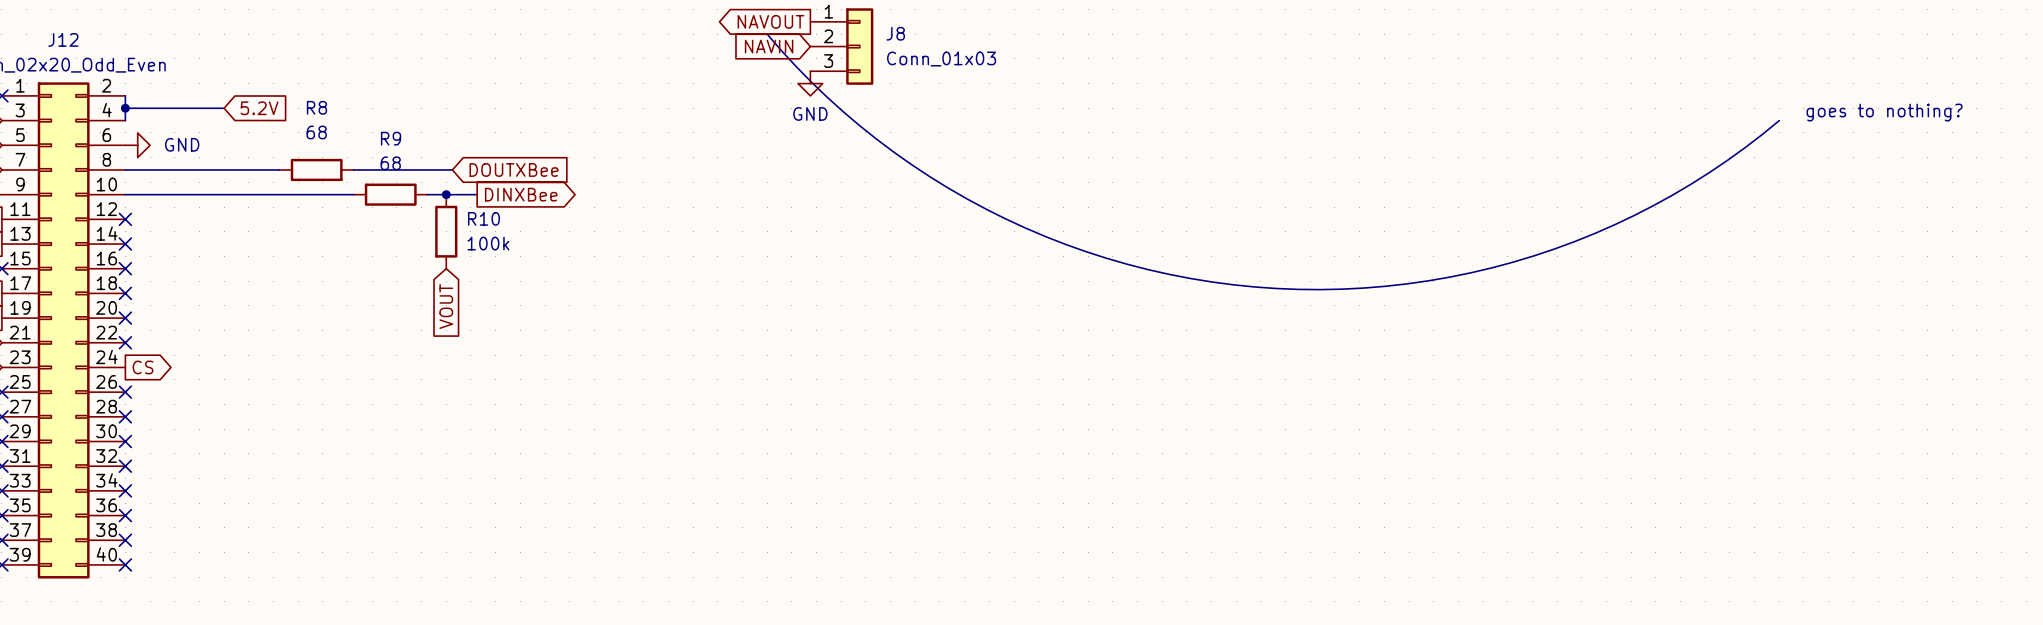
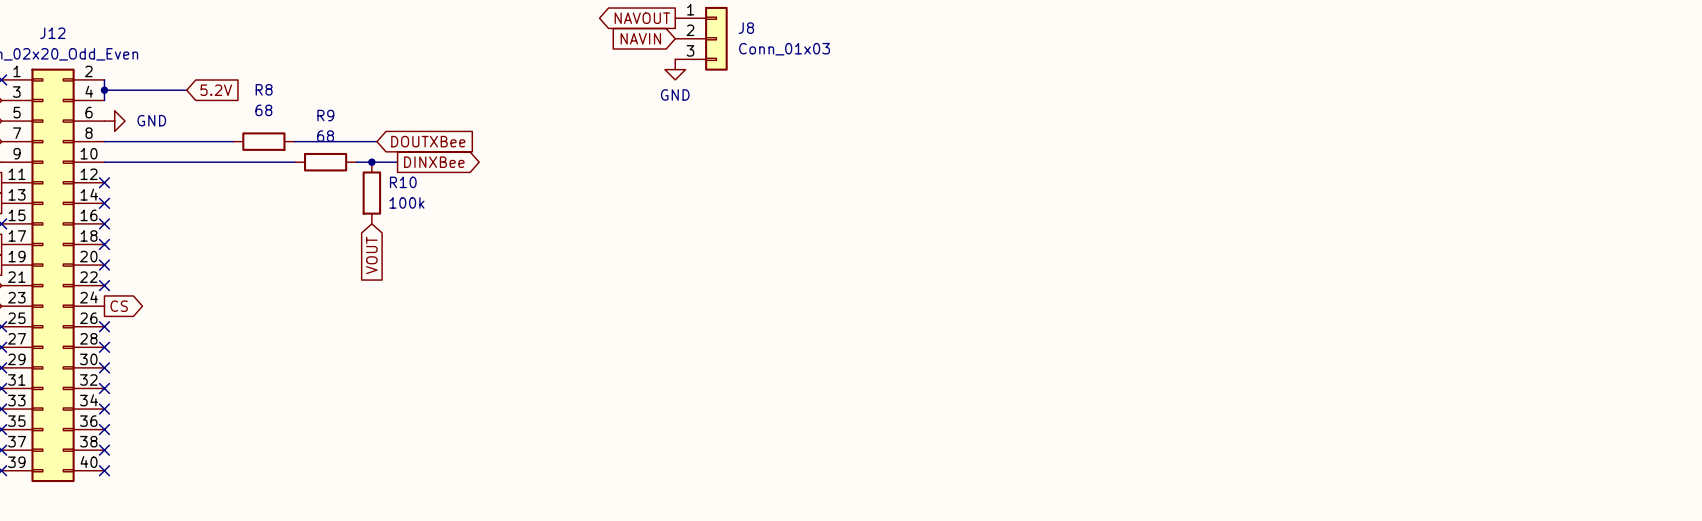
line: (767, 34) (826, 97) (876, 139) (929, 176) (986, 209) (1045, 236) (1127, 264) (1190, 278) (1255, 287) (1342, 289) (1406, 283) (1471, 272) (1533, 255) (1614, 224) (1672, 195) (1727, 160) (1779, 120) -> none
text: goes to nothing? (1884, 112) -> none

